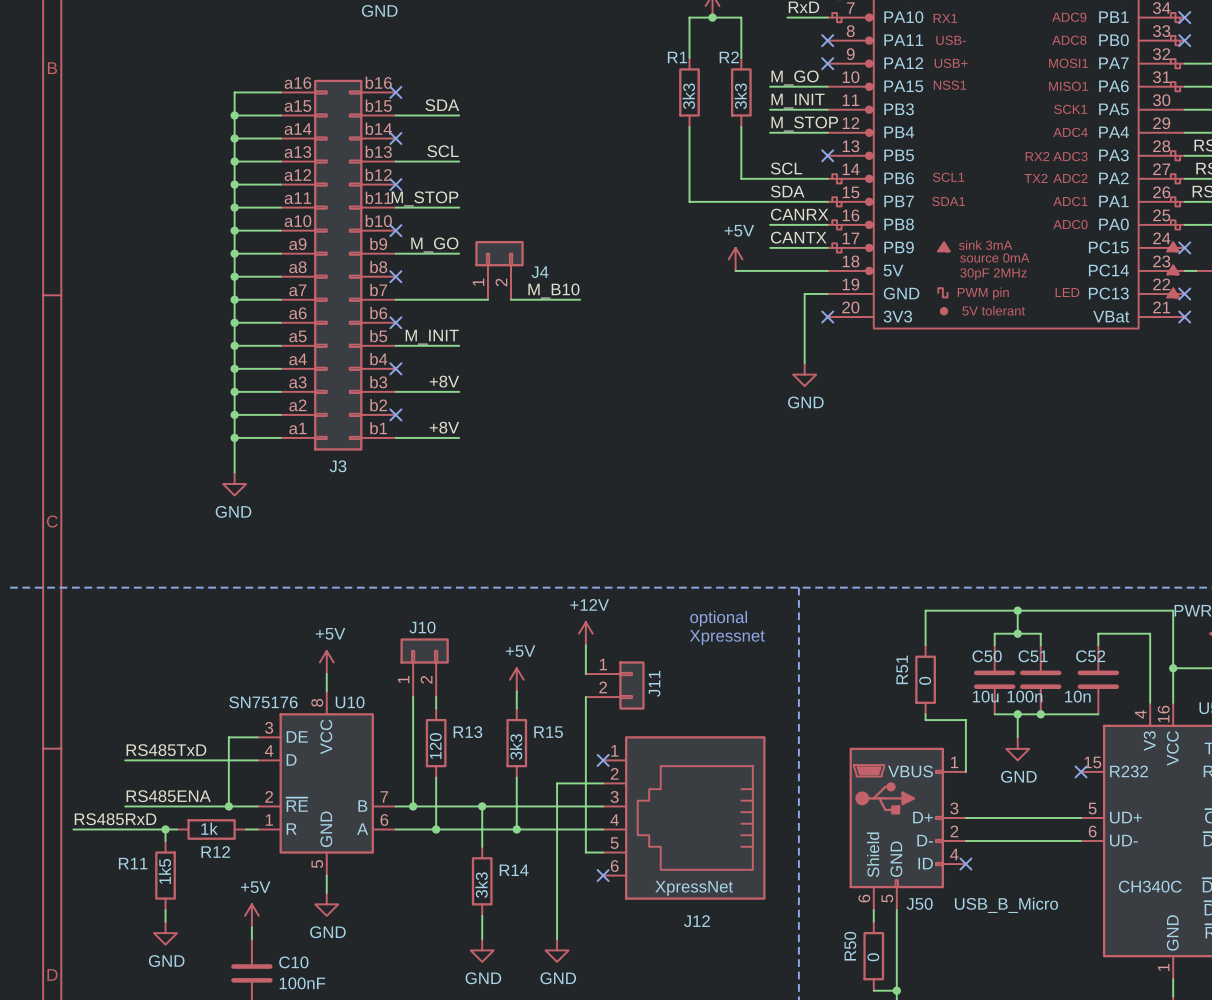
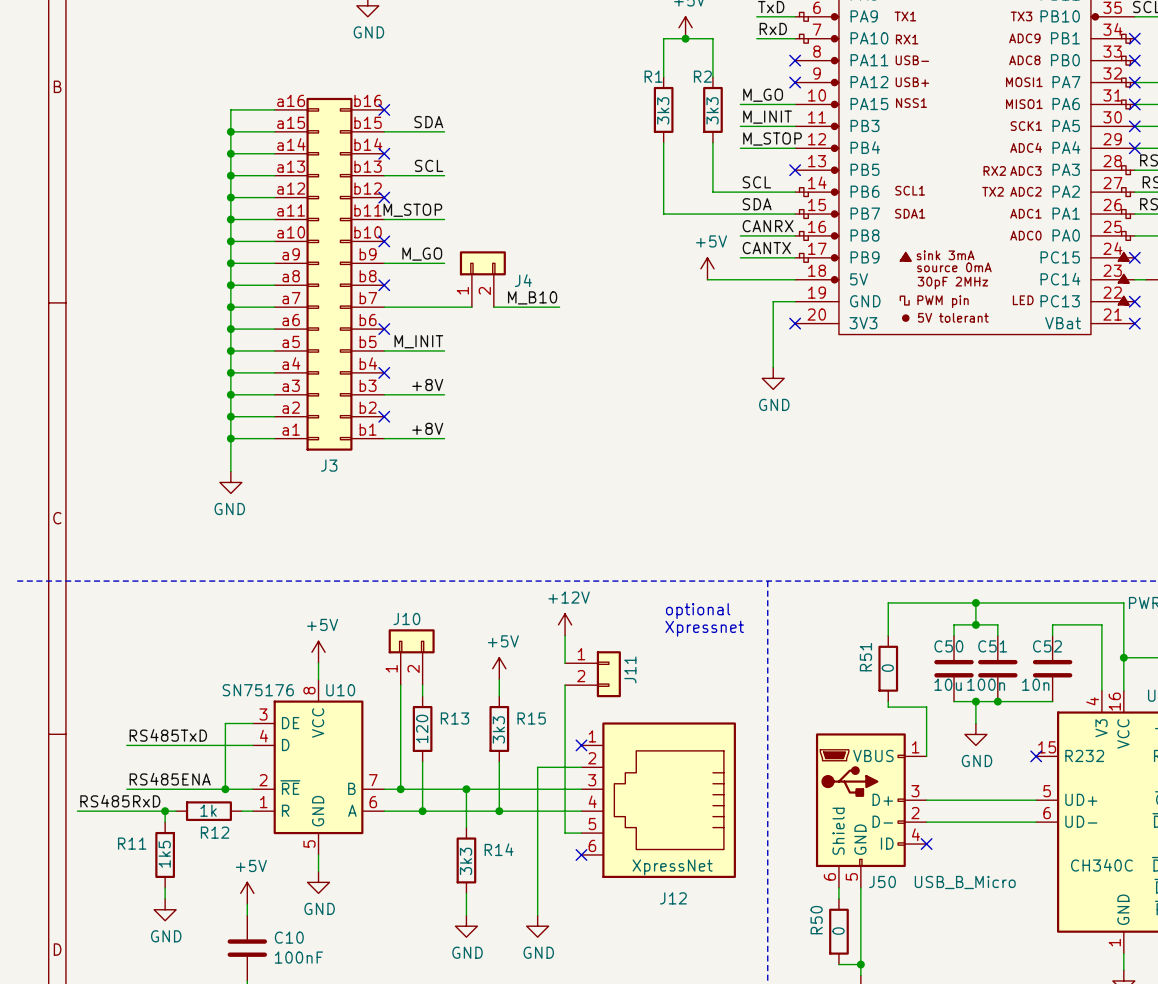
no-connect mark: none -> (1134, 82)
no-connect mark: none -> (1134, 104)
no-connect mark: none -> (1134, 126)
no-connect mark: none -> (1134, 148)

